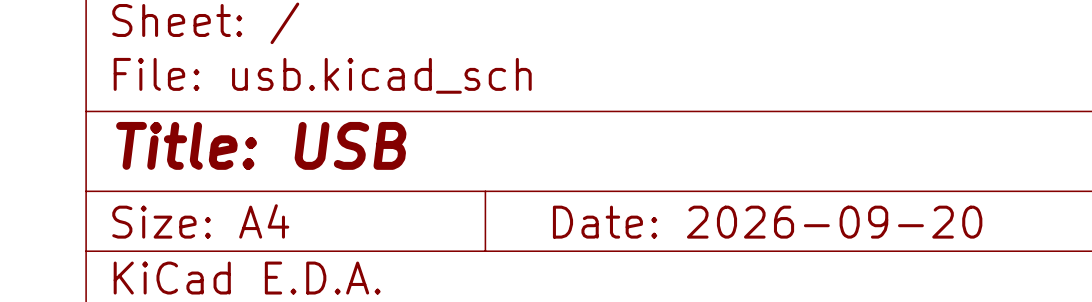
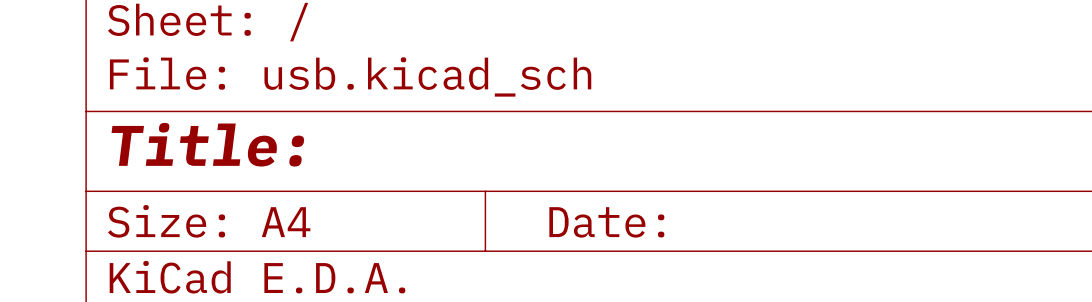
title block: Title: USB (261, 145) -> Title: (207, 144)
title block: Date: 2026-09-20 (767, 222) -> Date: (606, 222)

